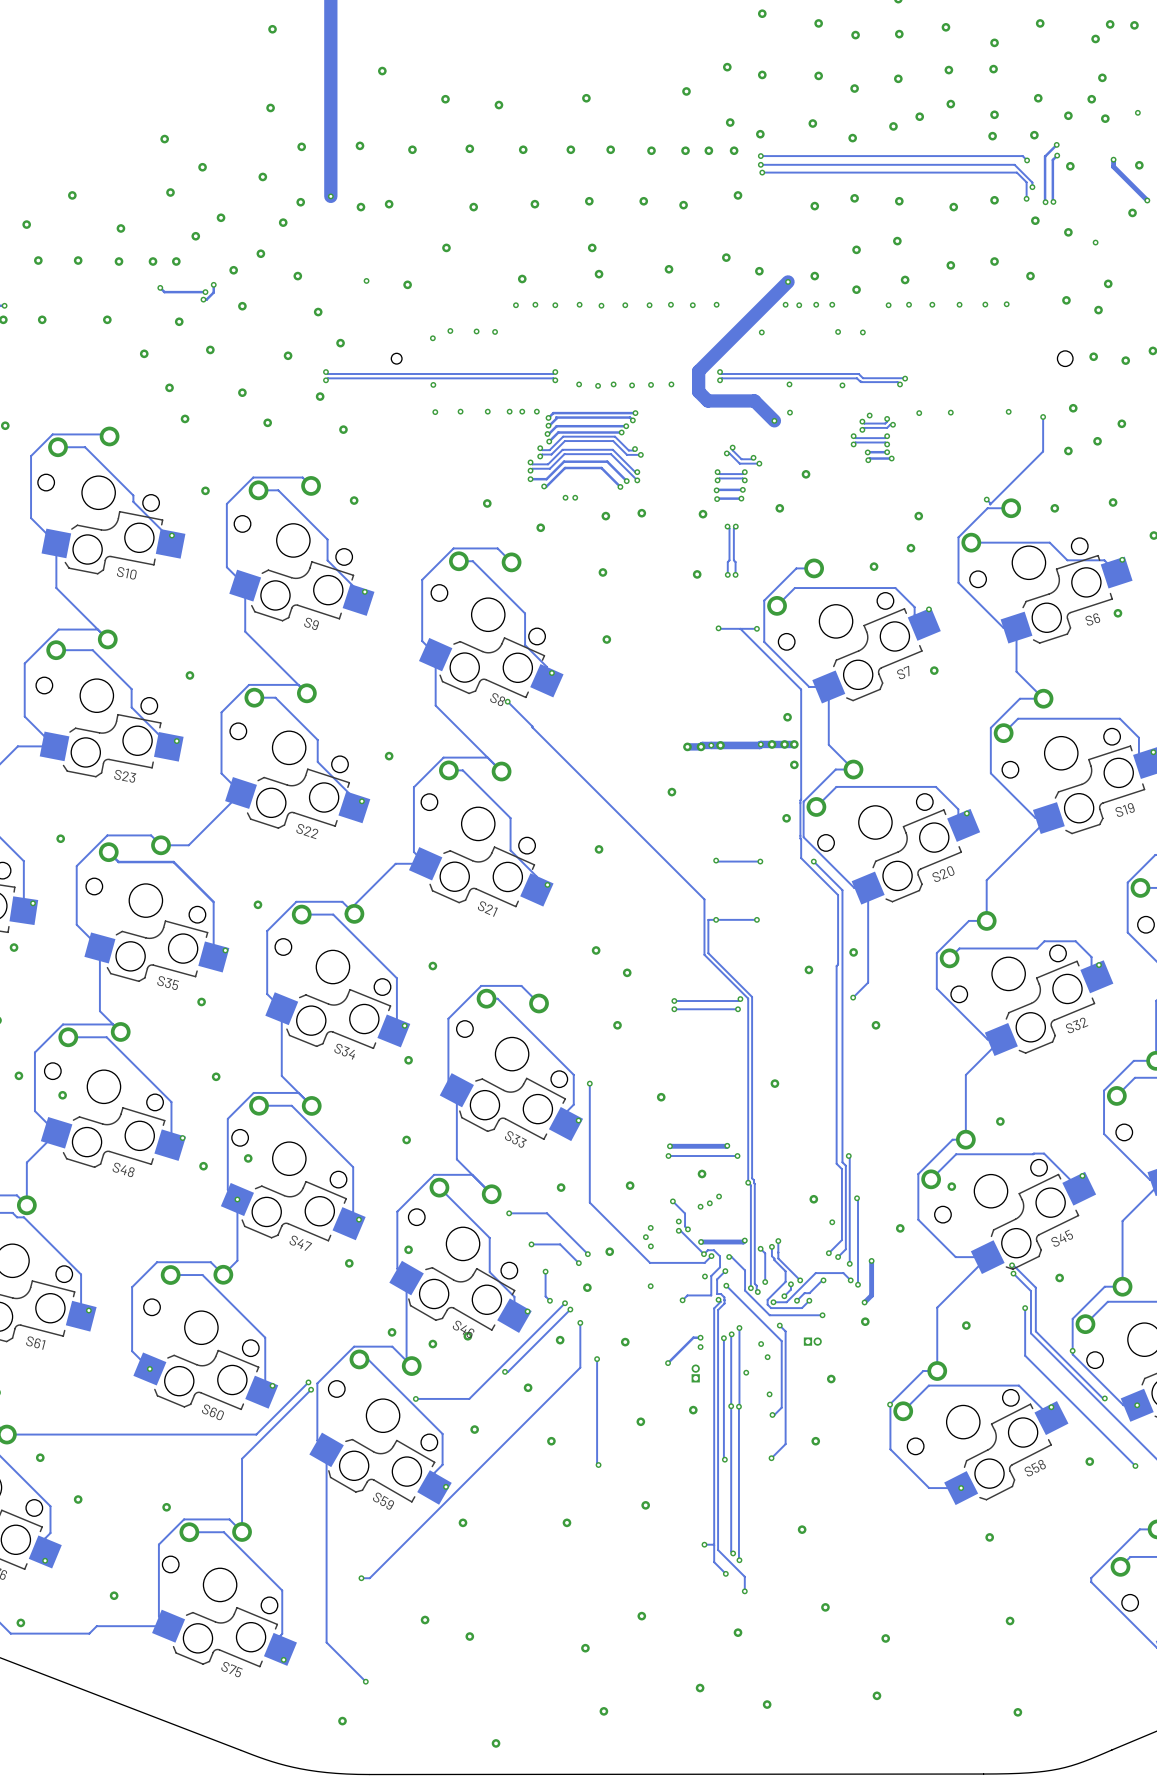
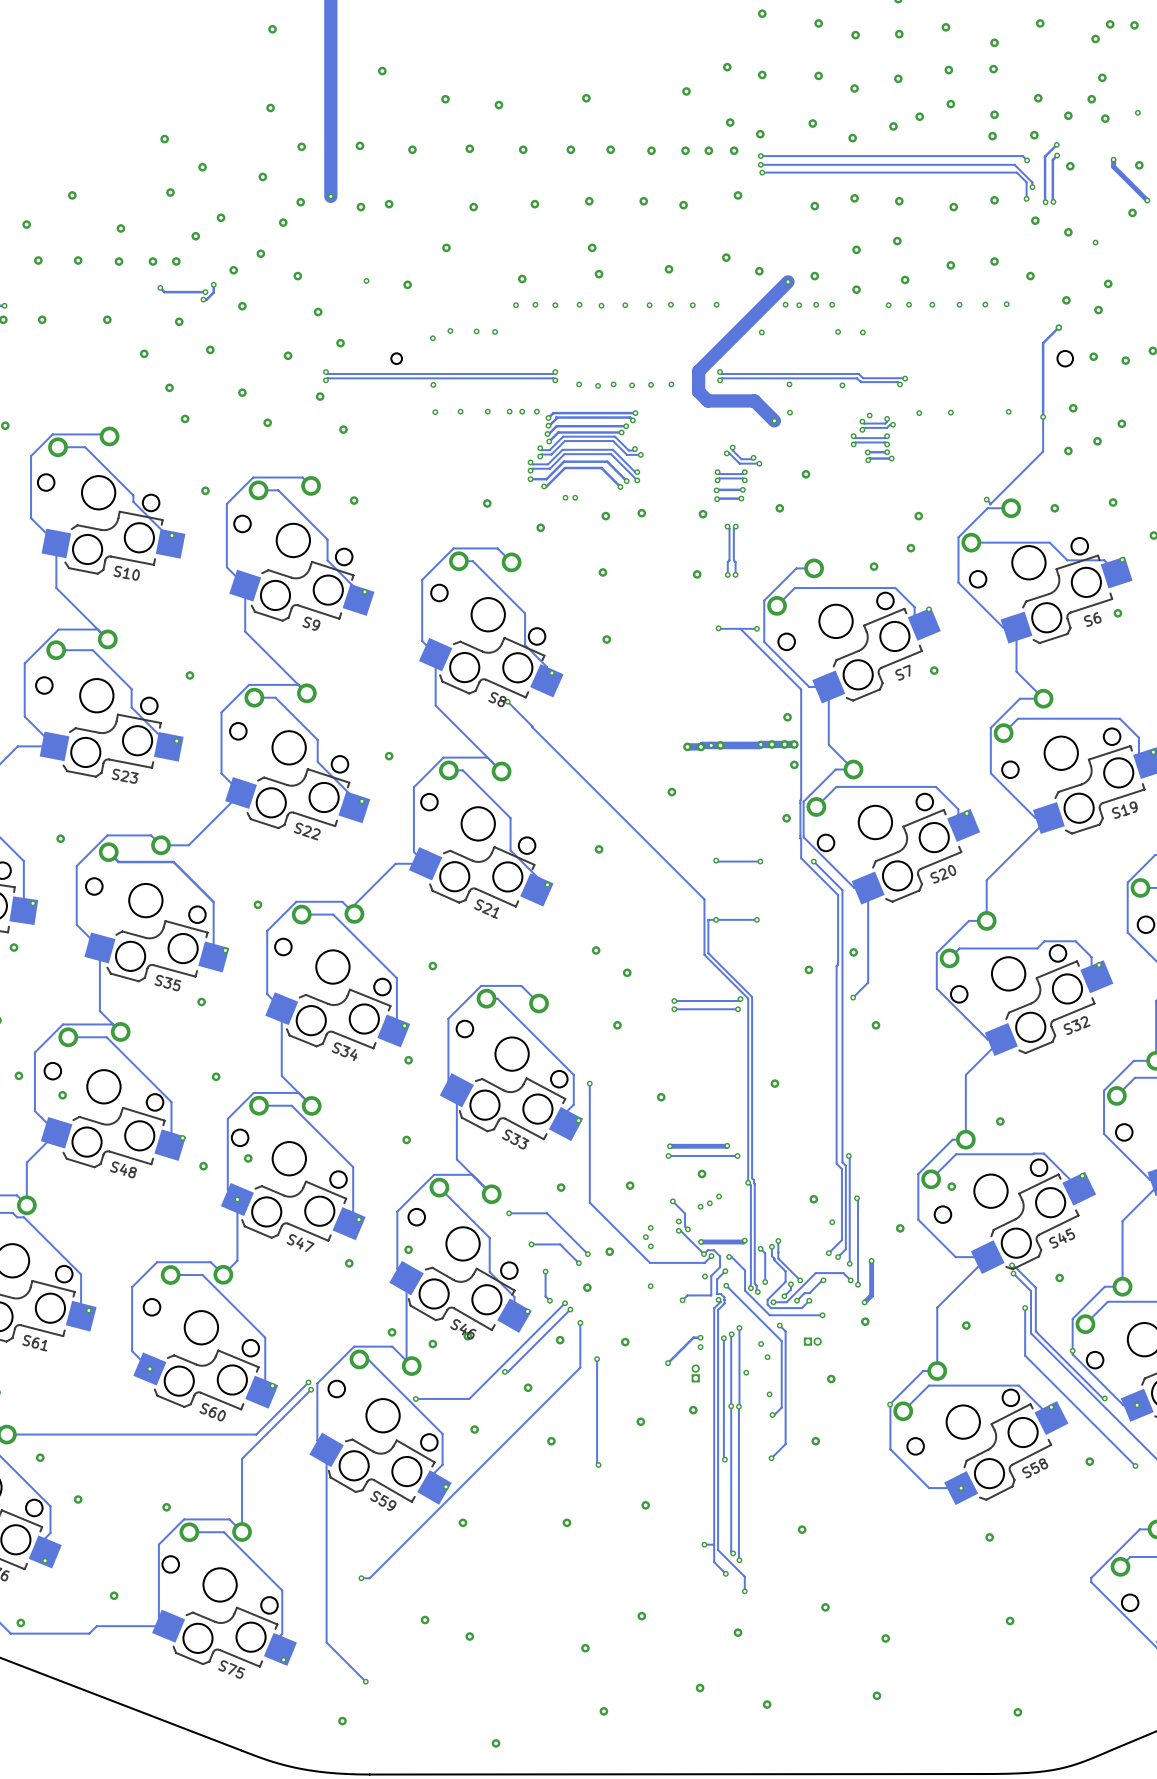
track: none -> (1058, 327) (1043, 343) (1043, 416)
via: none -> (1058, 327)

